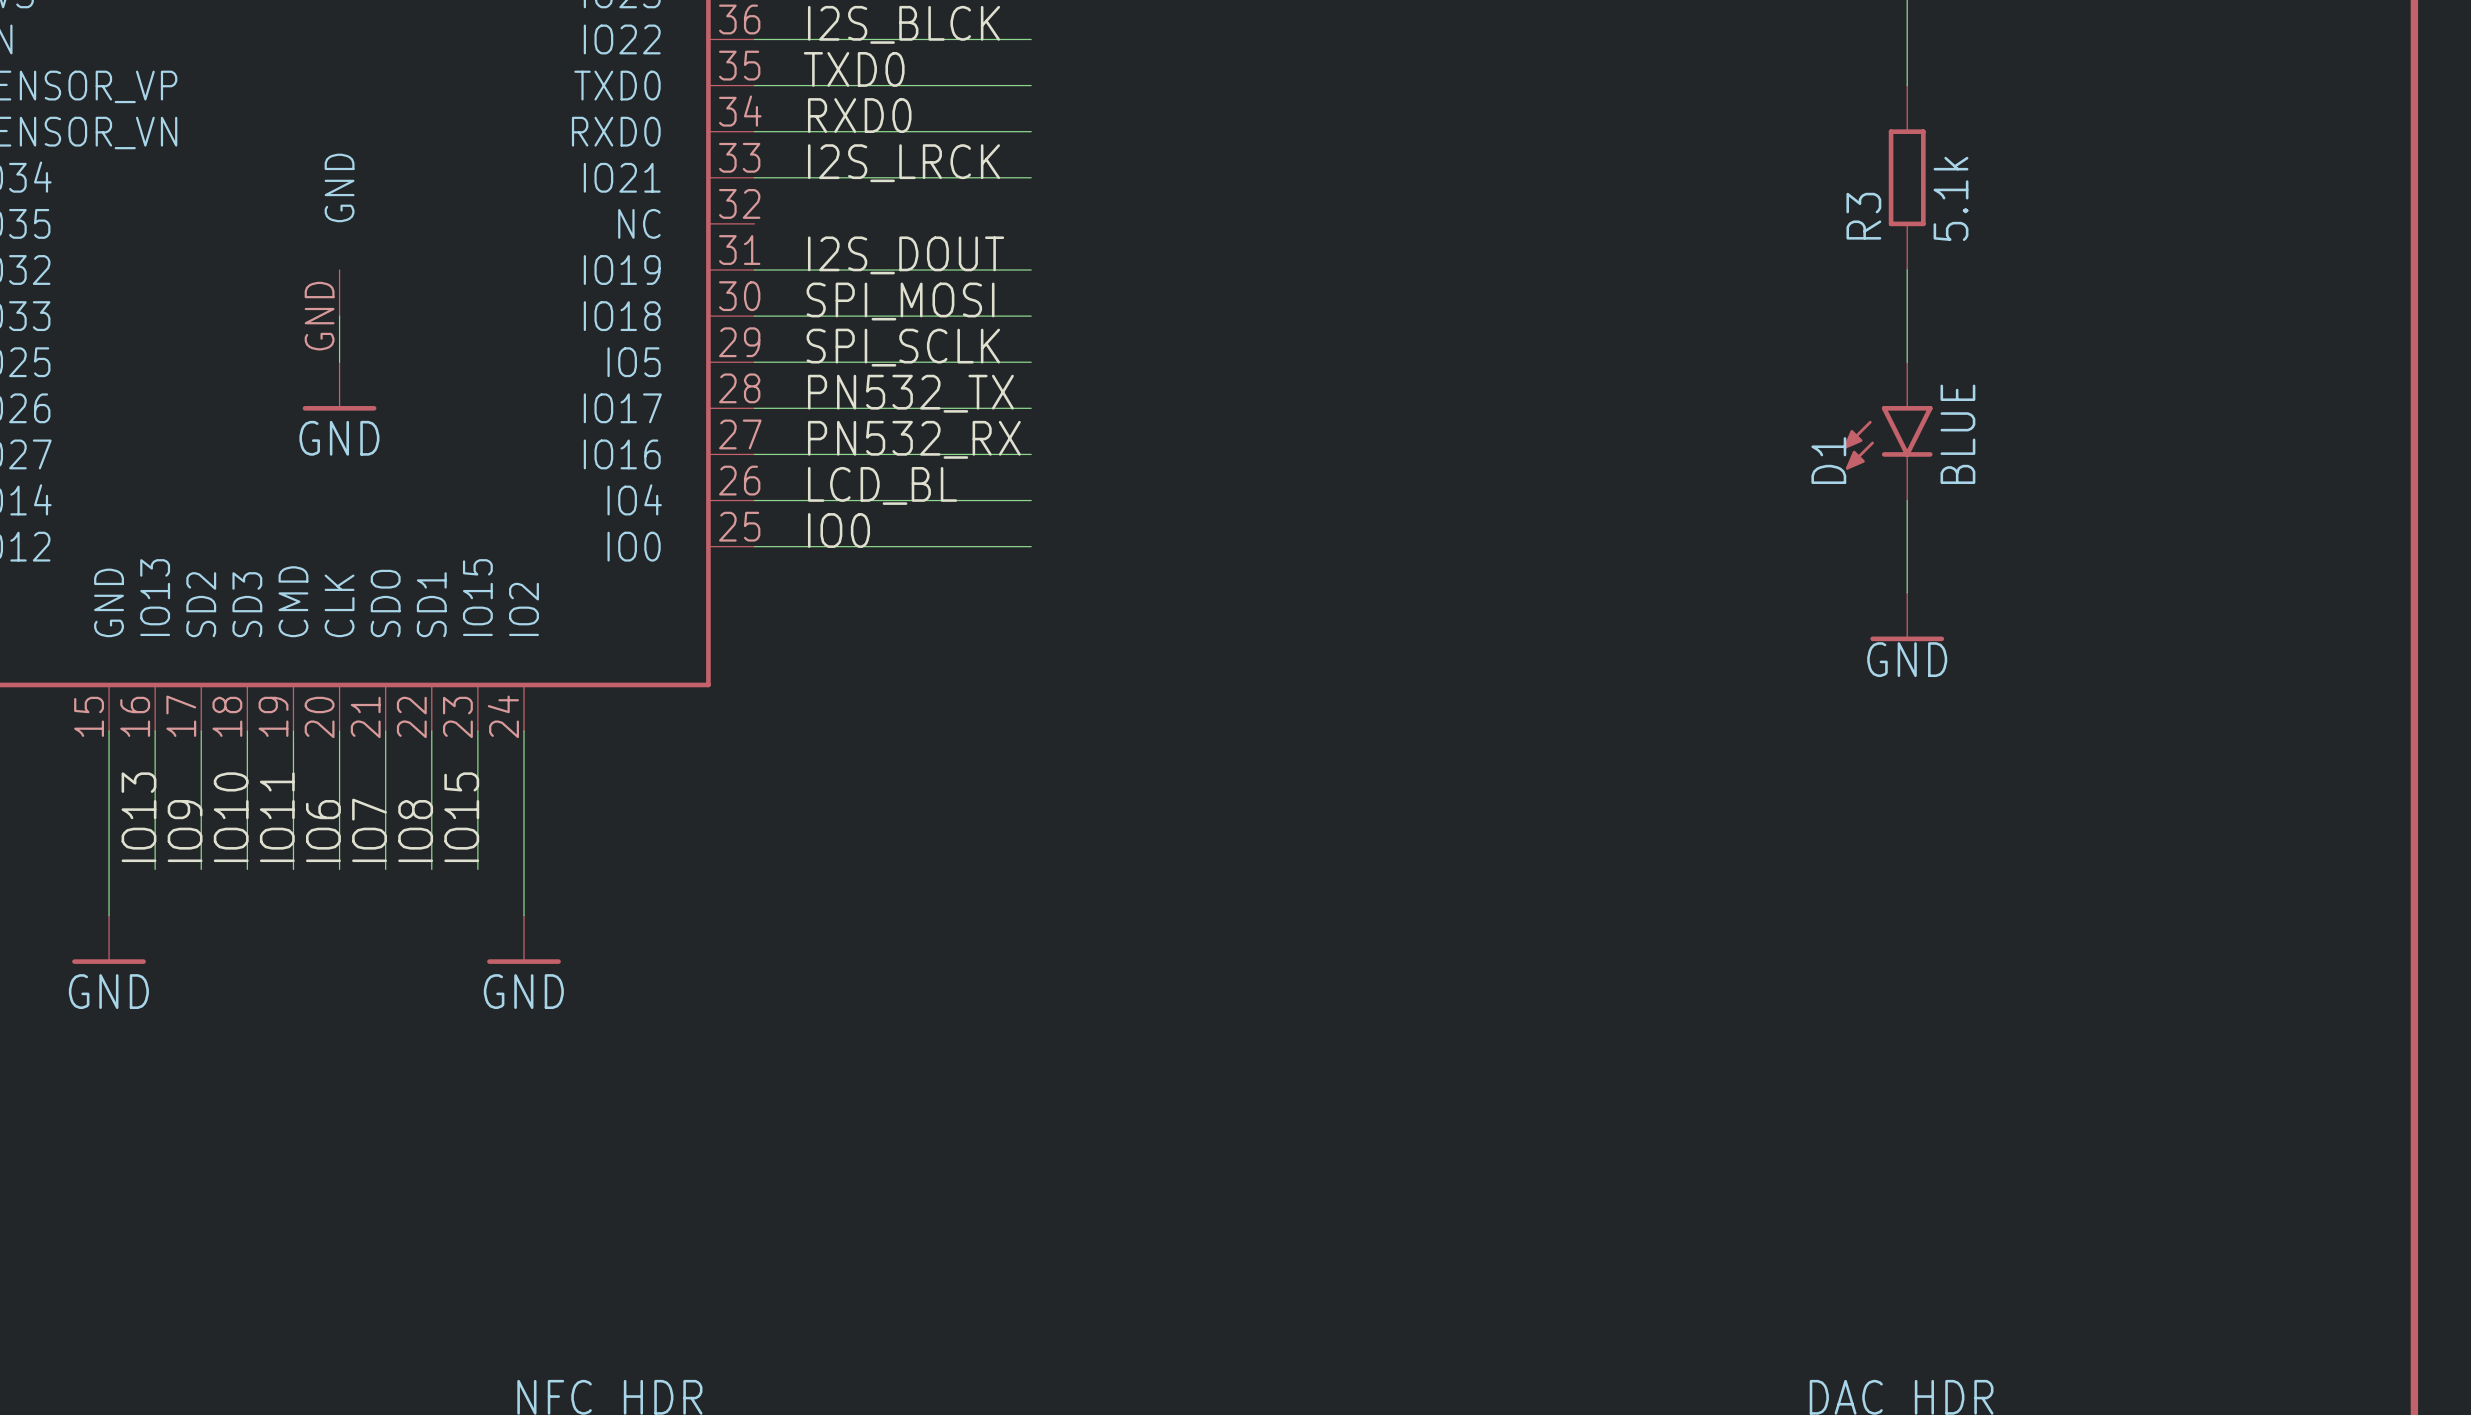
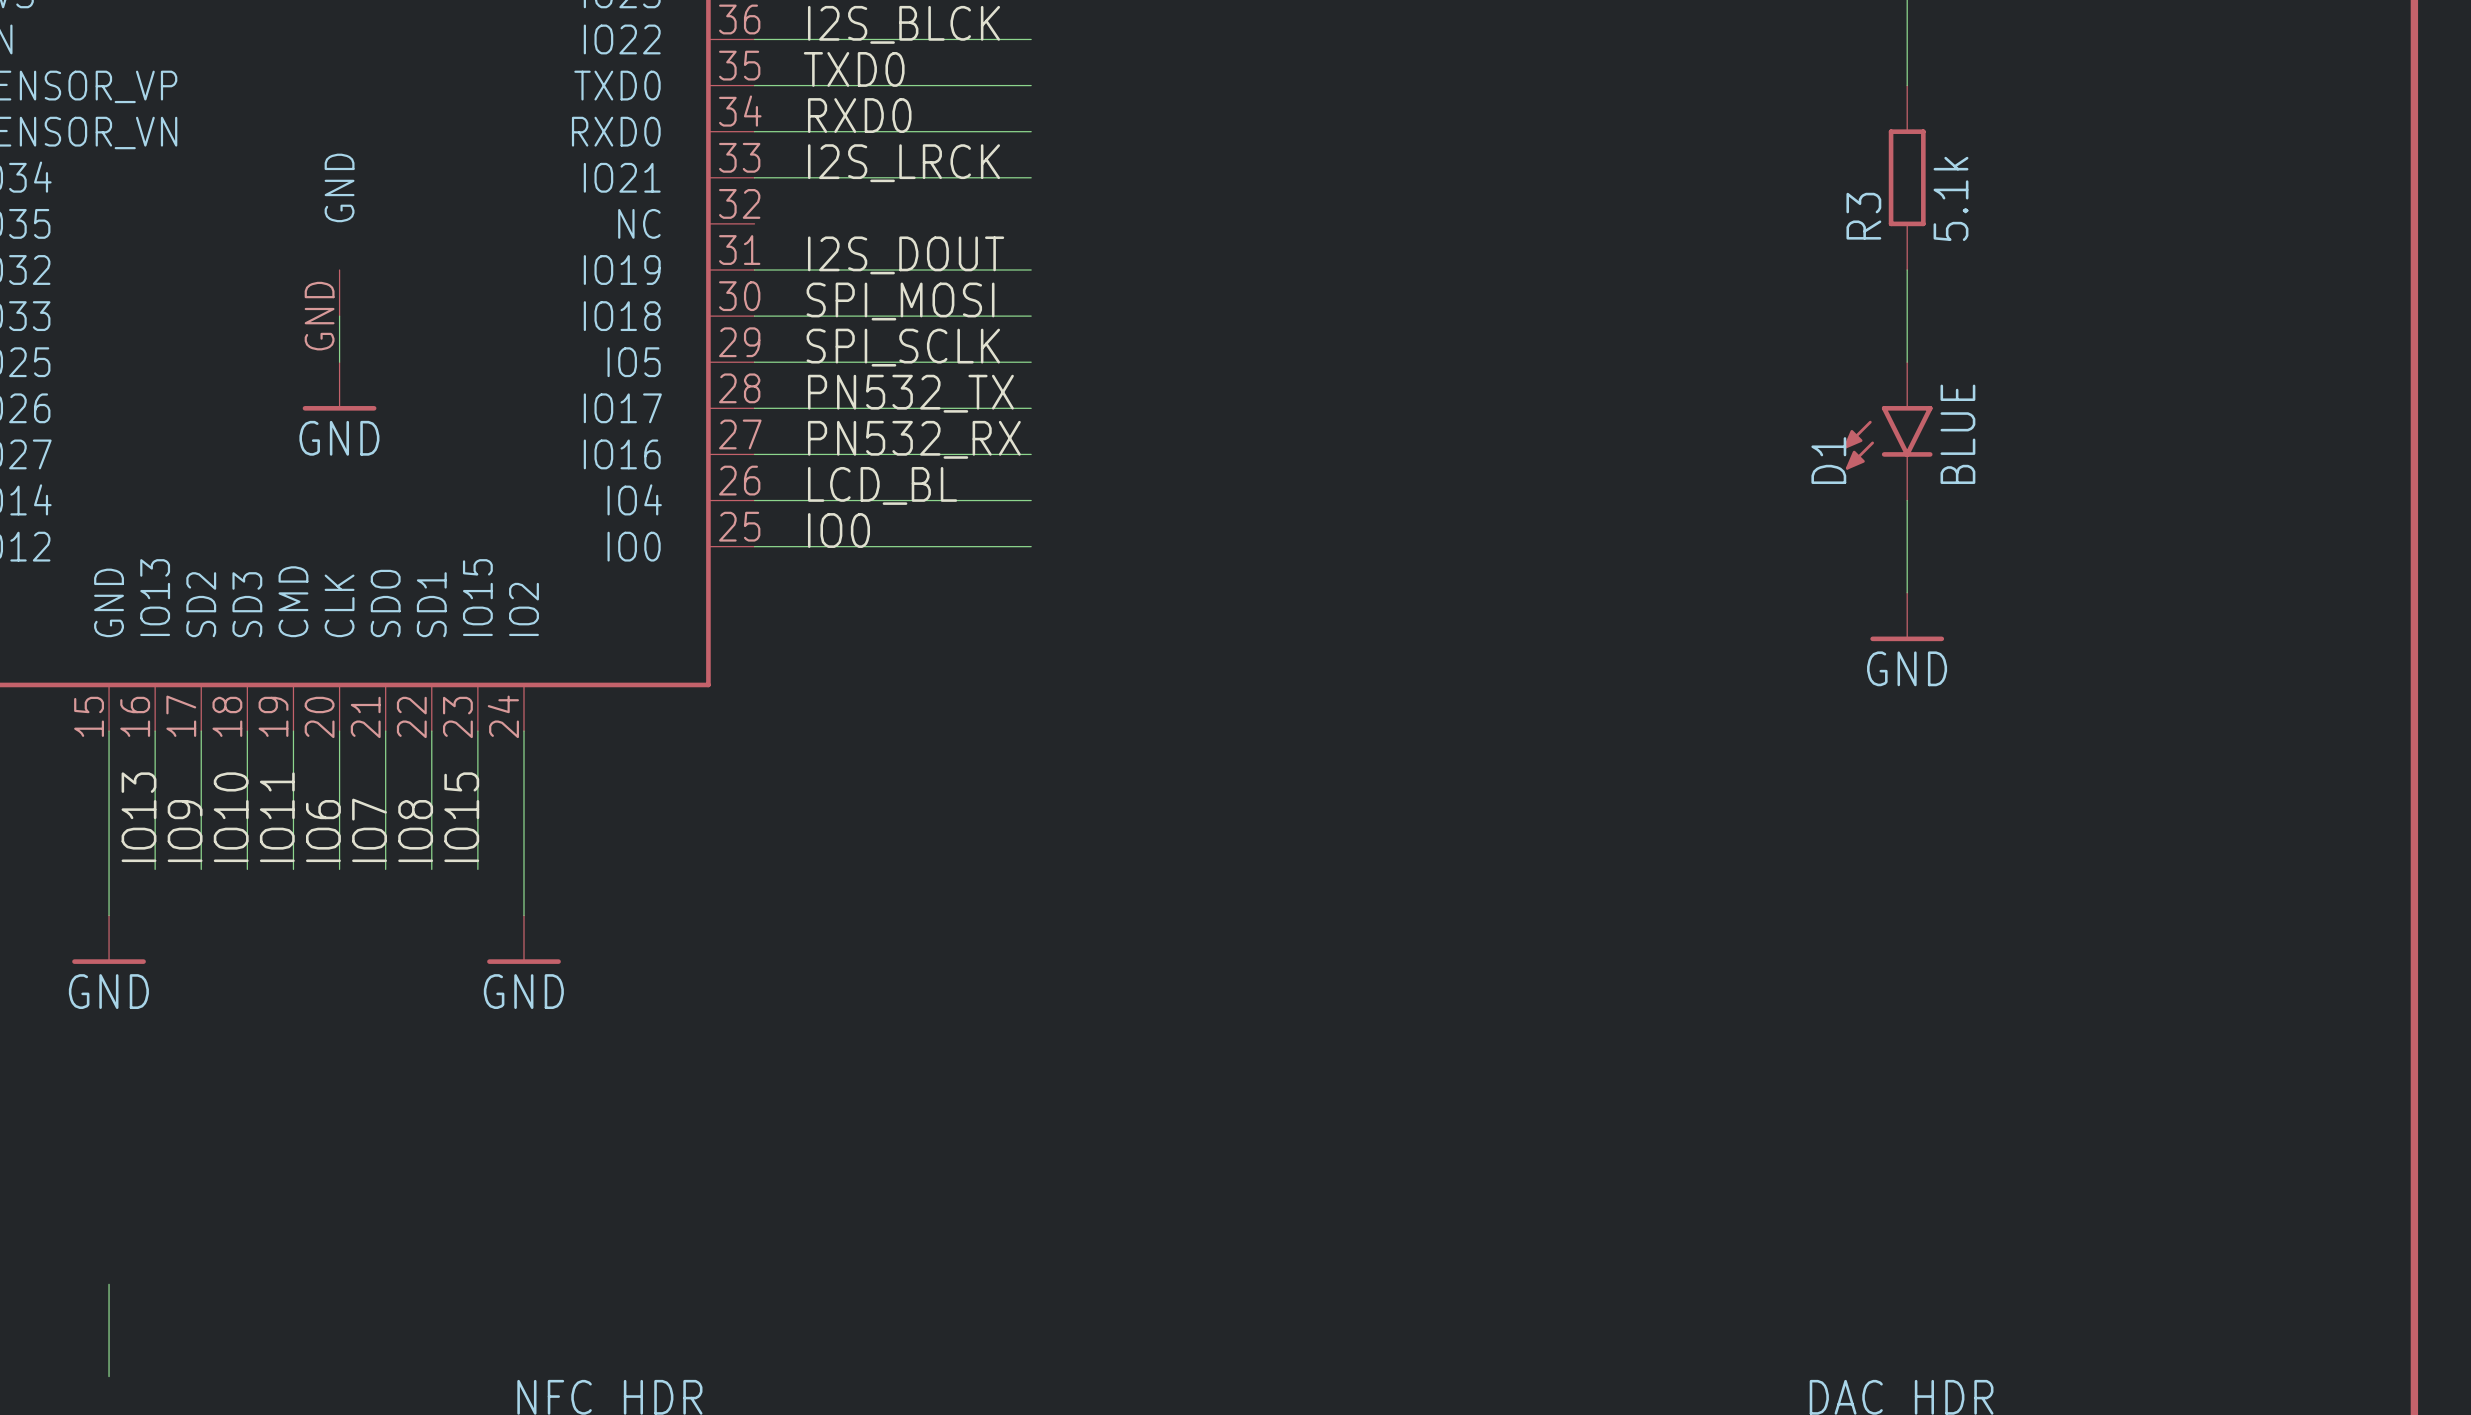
power symbol text position: GND (1907, 659) -> GND (1907, 668)
wire: none -> (109, 1284) (109, 1376)

